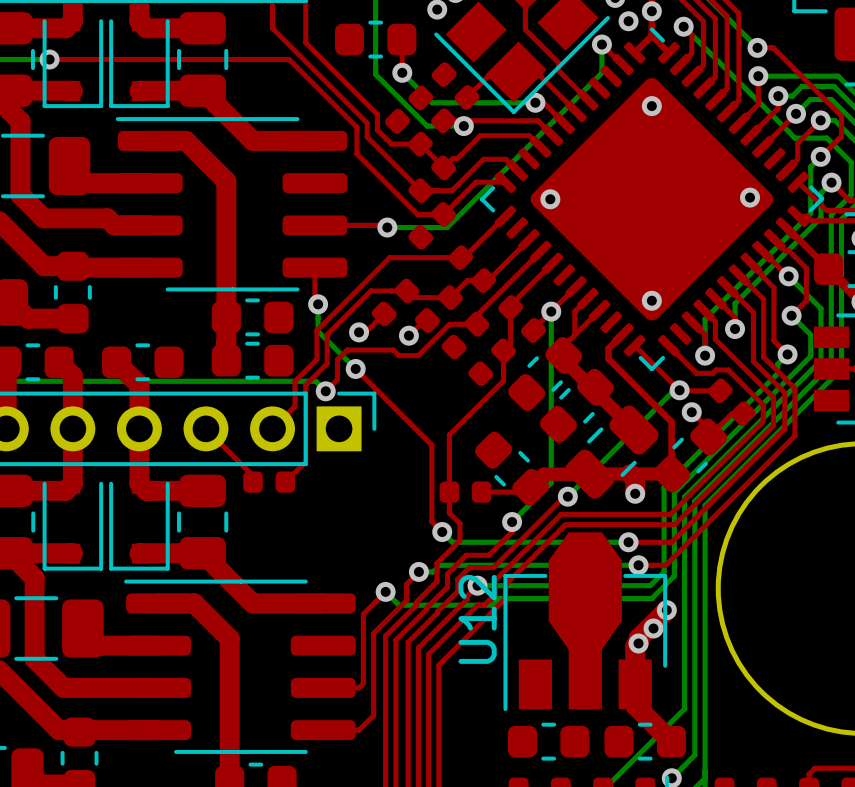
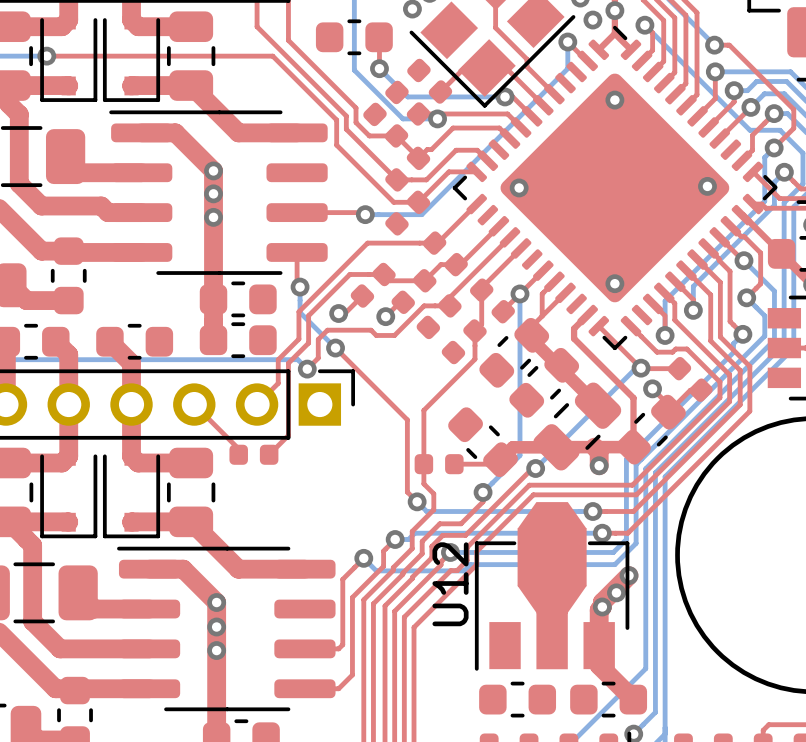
via: none -> (213, 170)
via: none -> (213, 193)
via: none -> (213, 217)
via: none -> (216, 602)
via: none -> (216, 627)
via: none -> (216, 650)

